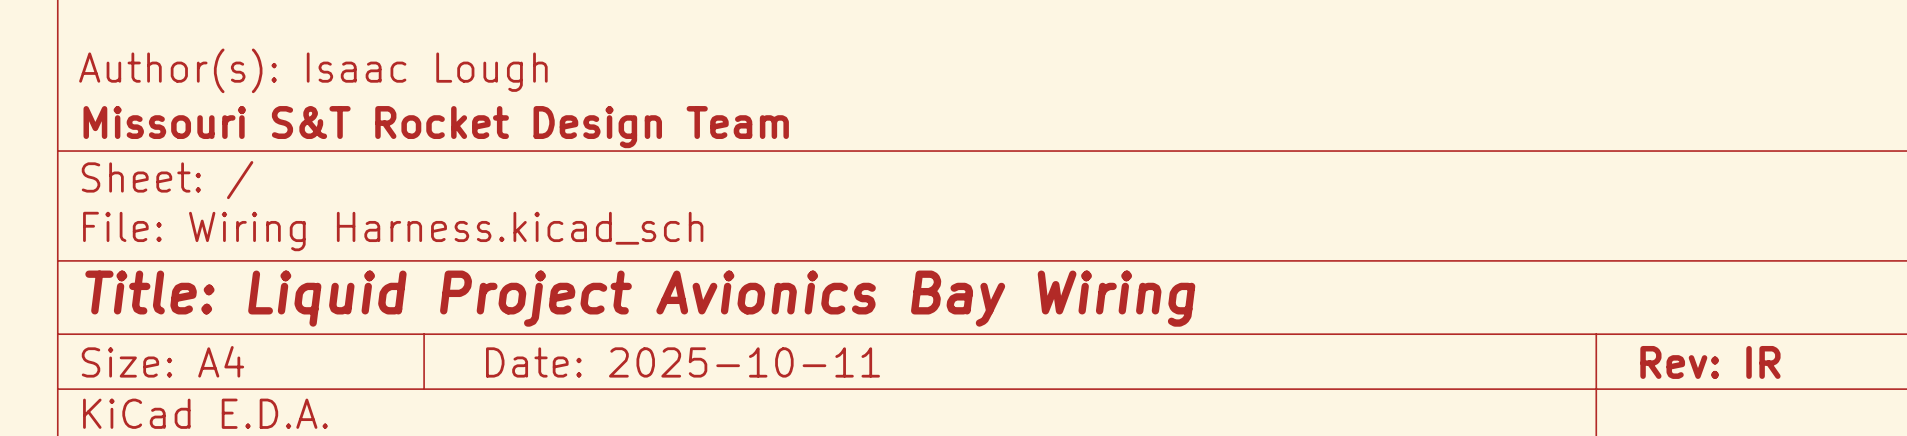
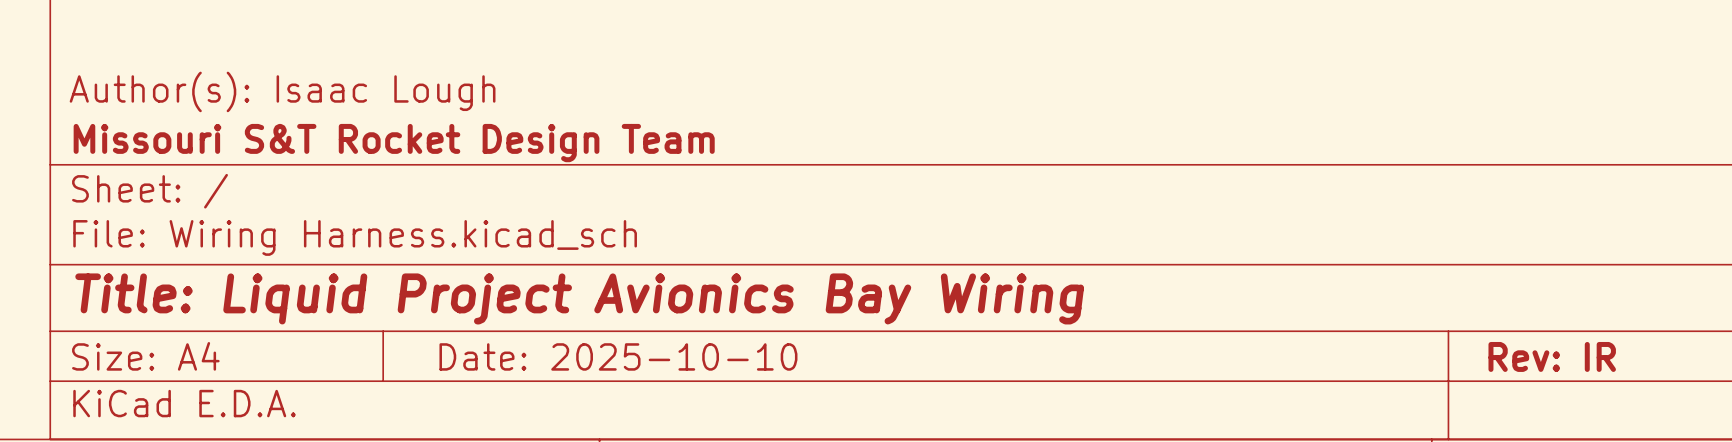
title block: Date: 2025-10-11 (682, 362) -> Date: 2025-10-10 (618, 356)

